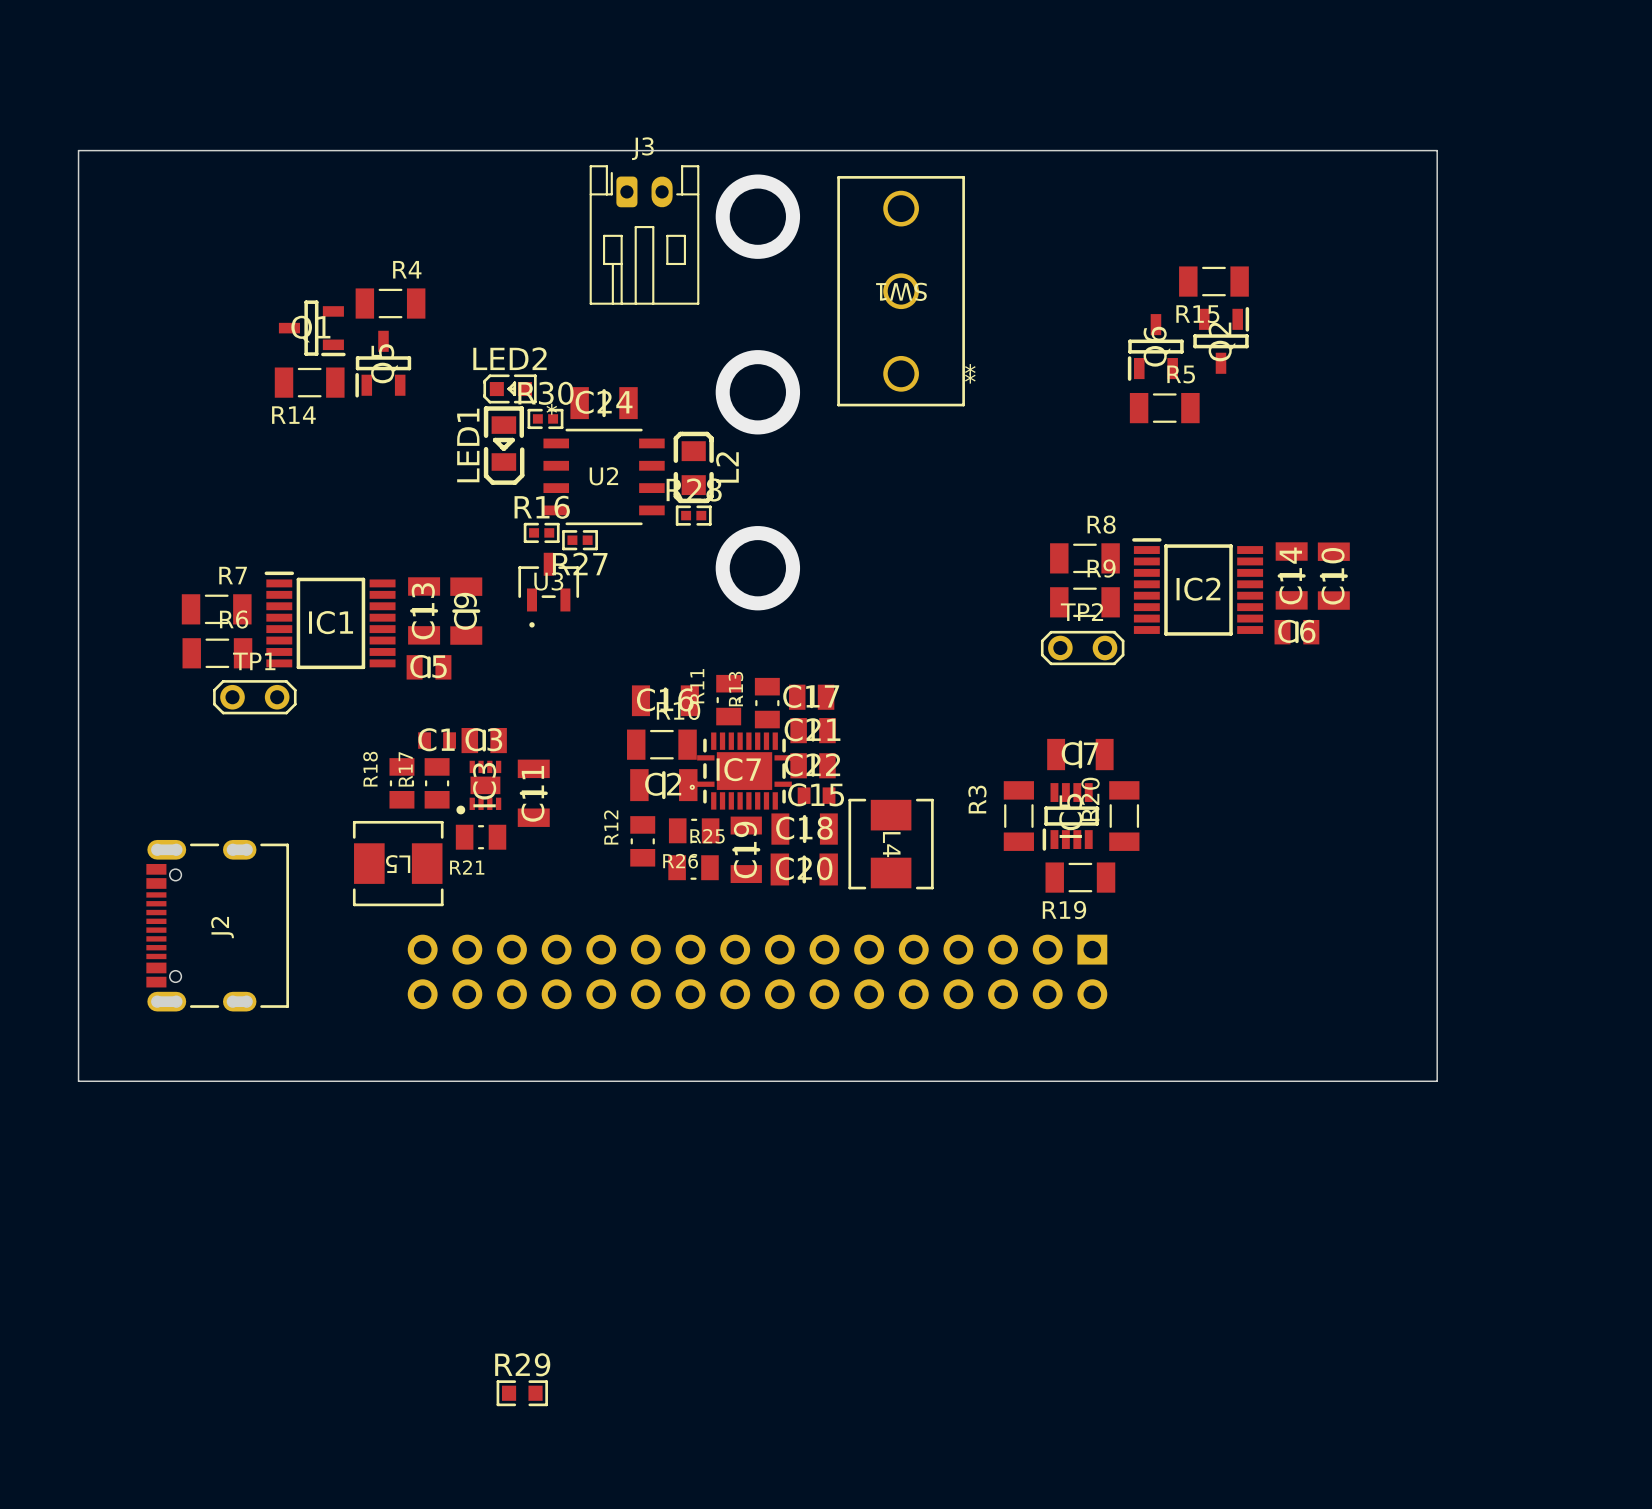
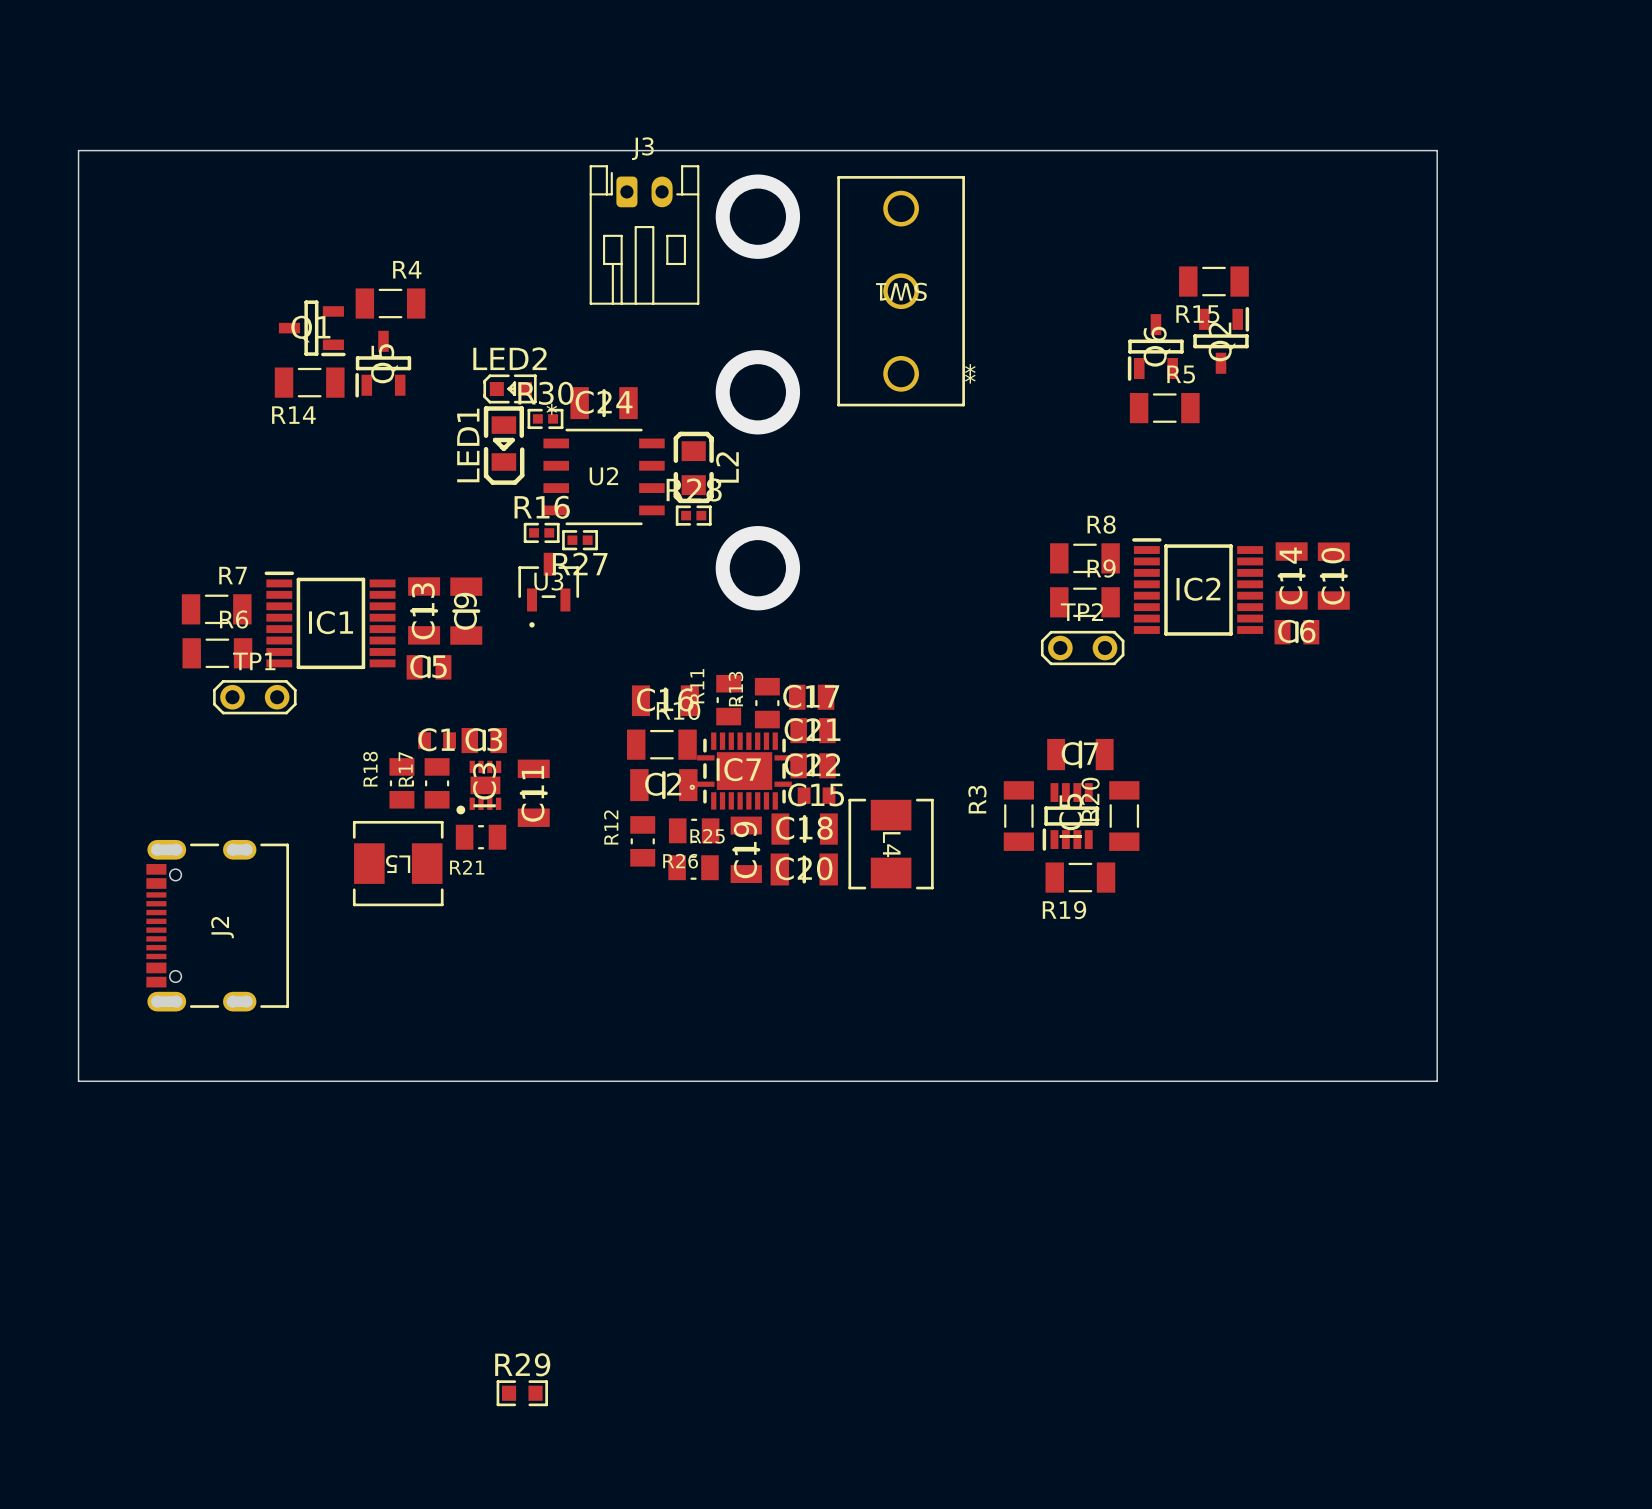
part: (757, 971) -> none

